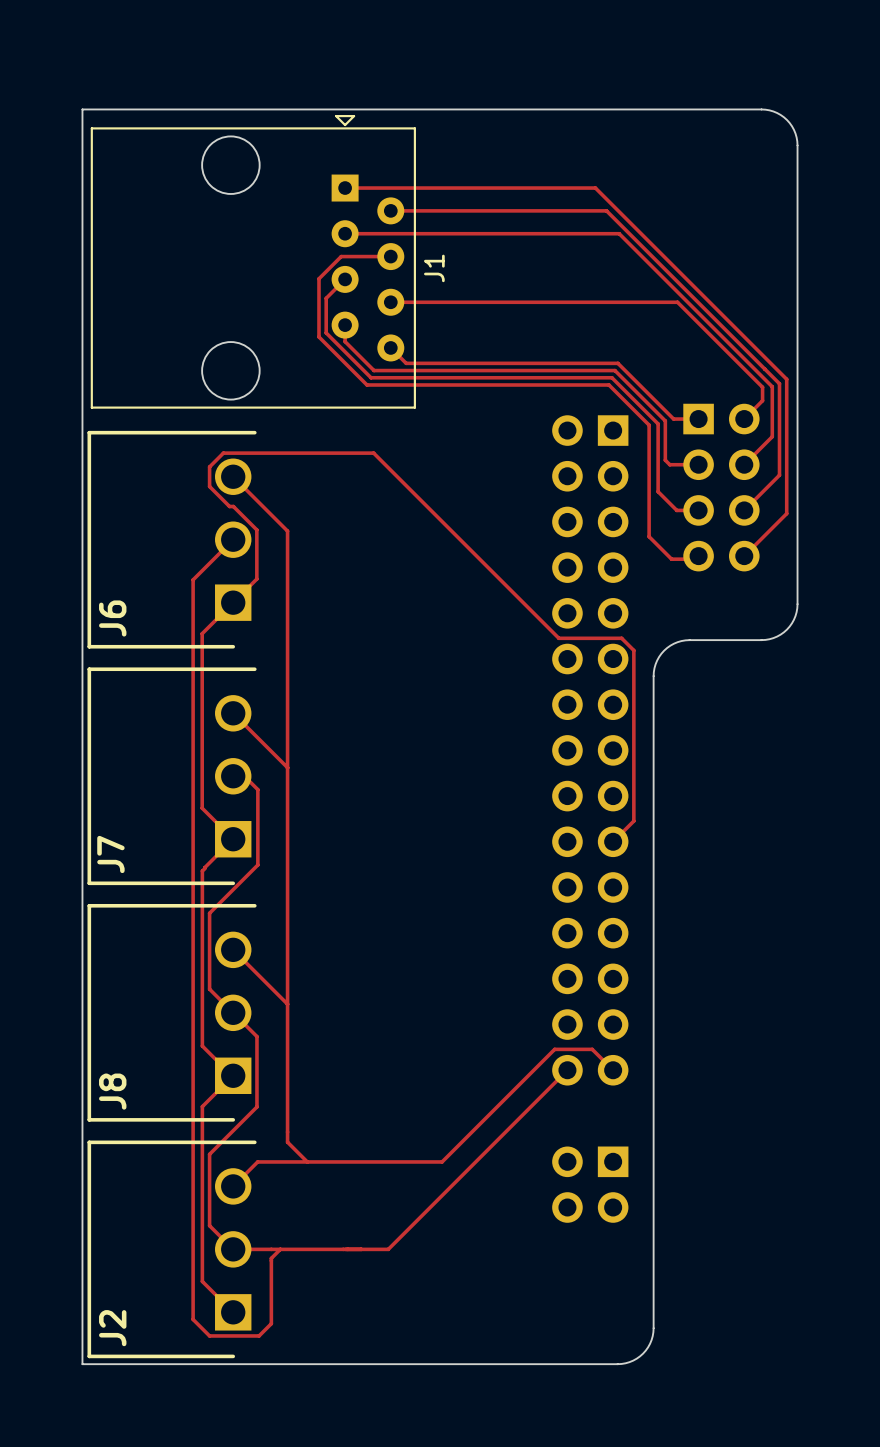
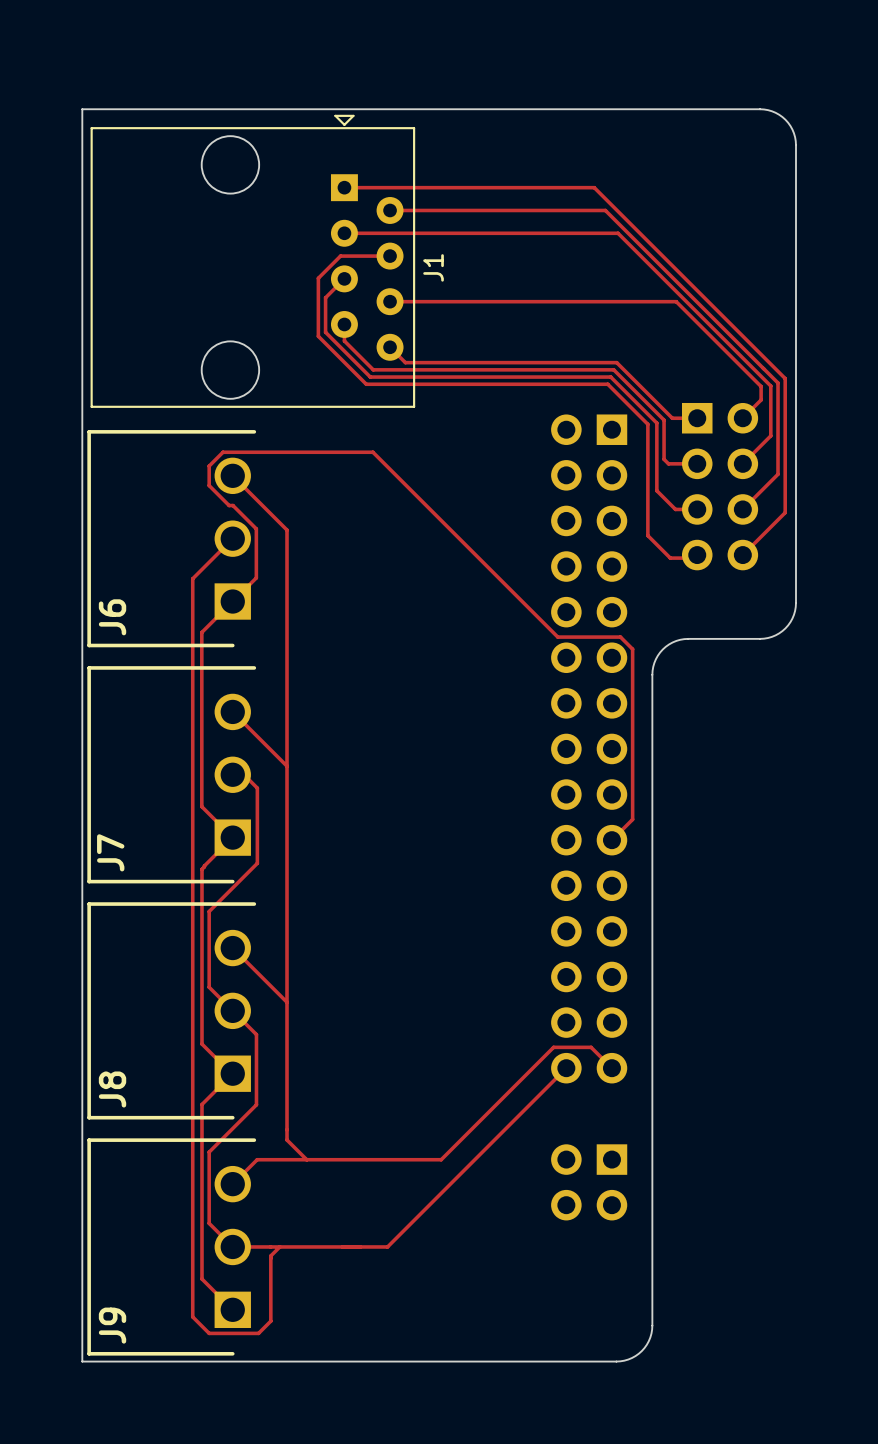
J2 name: J2 (112, 1328) -> J9 (112, 1325)

